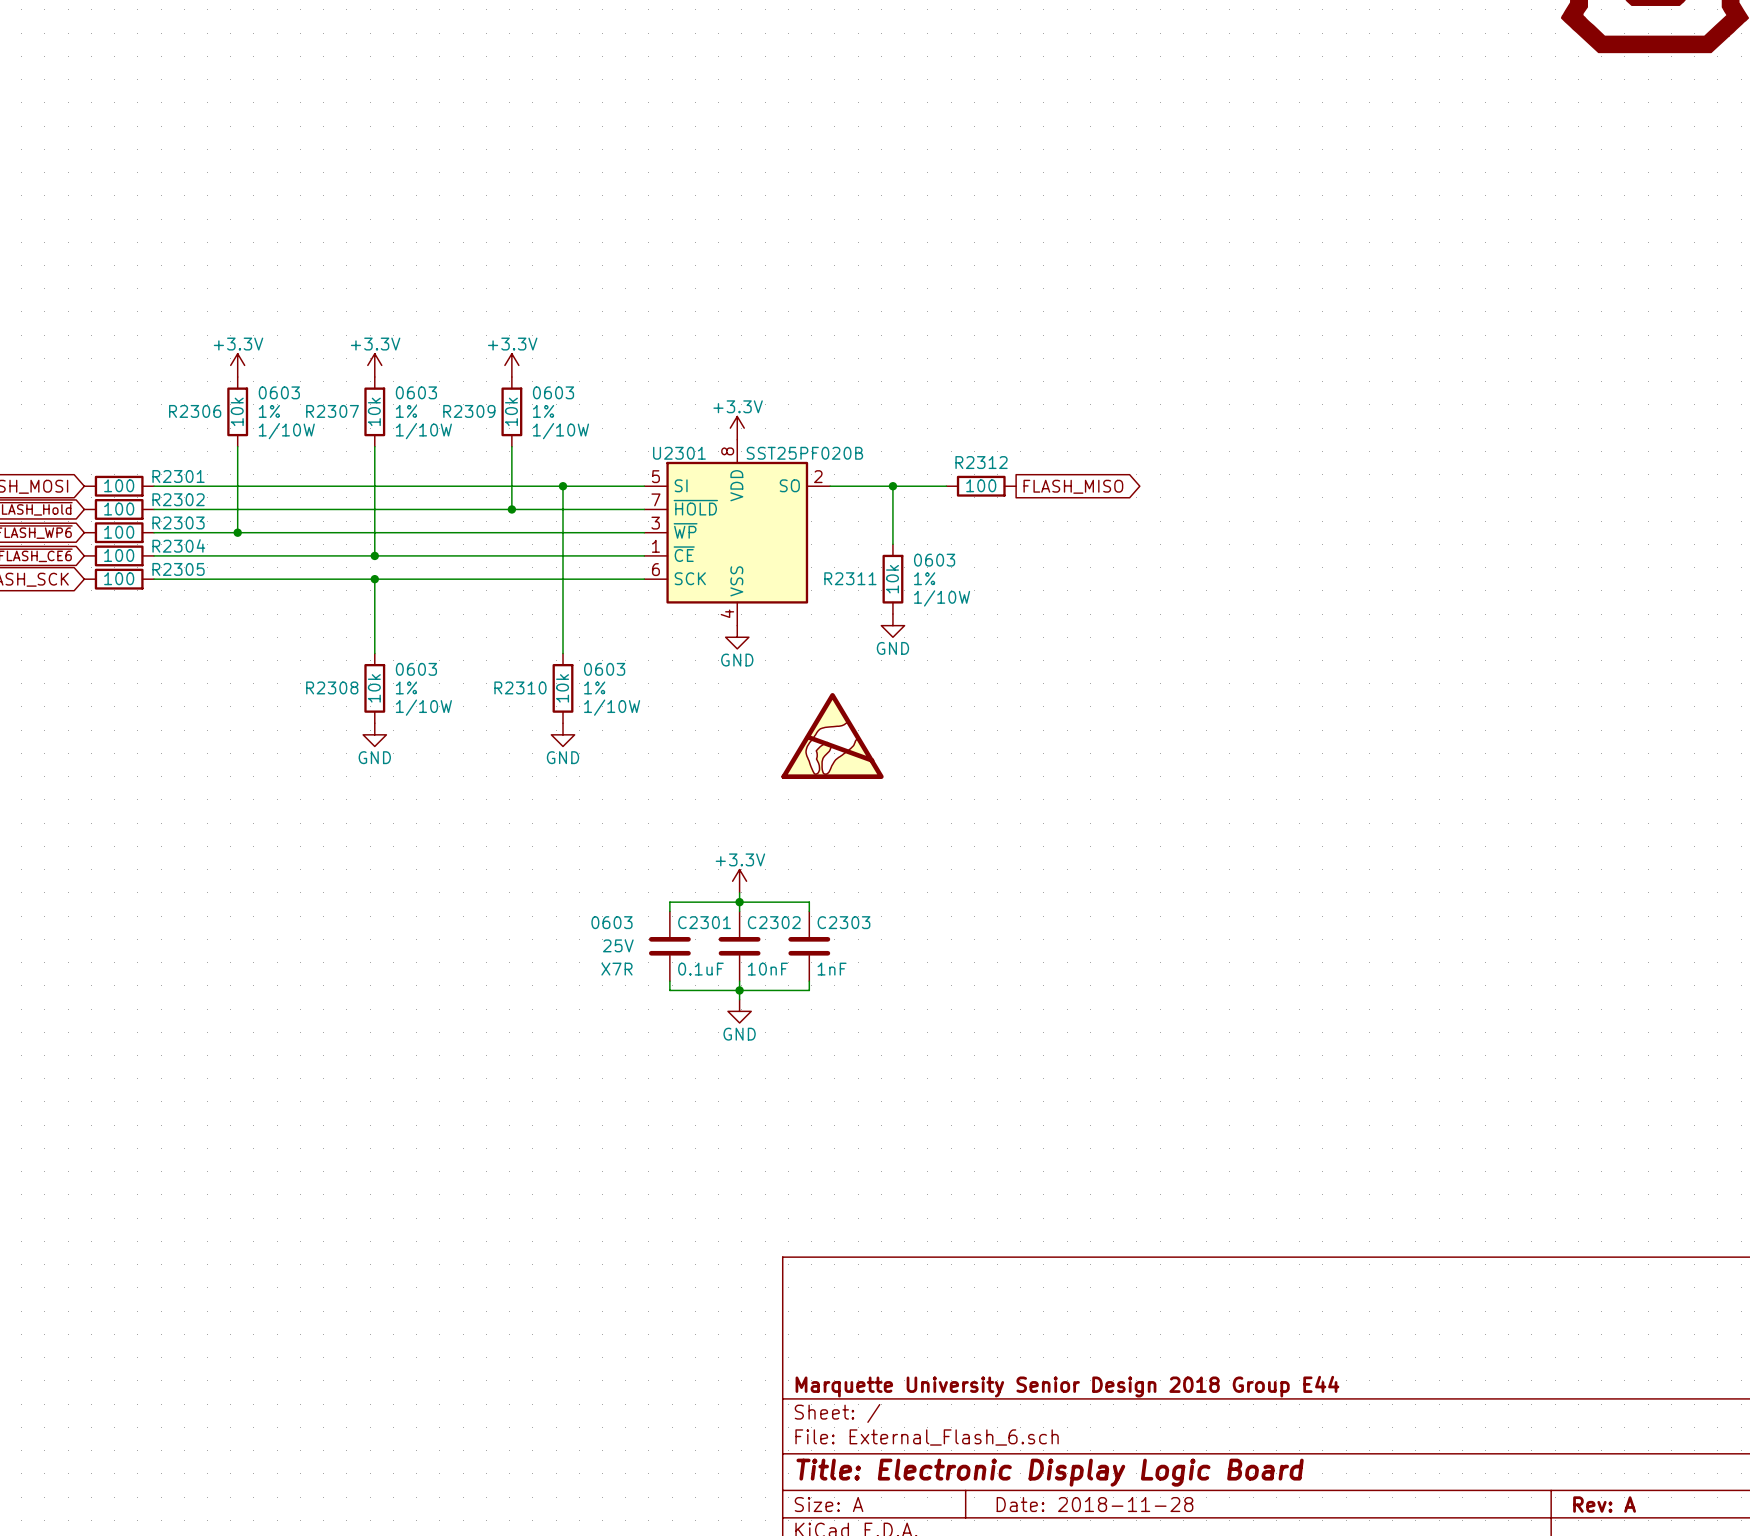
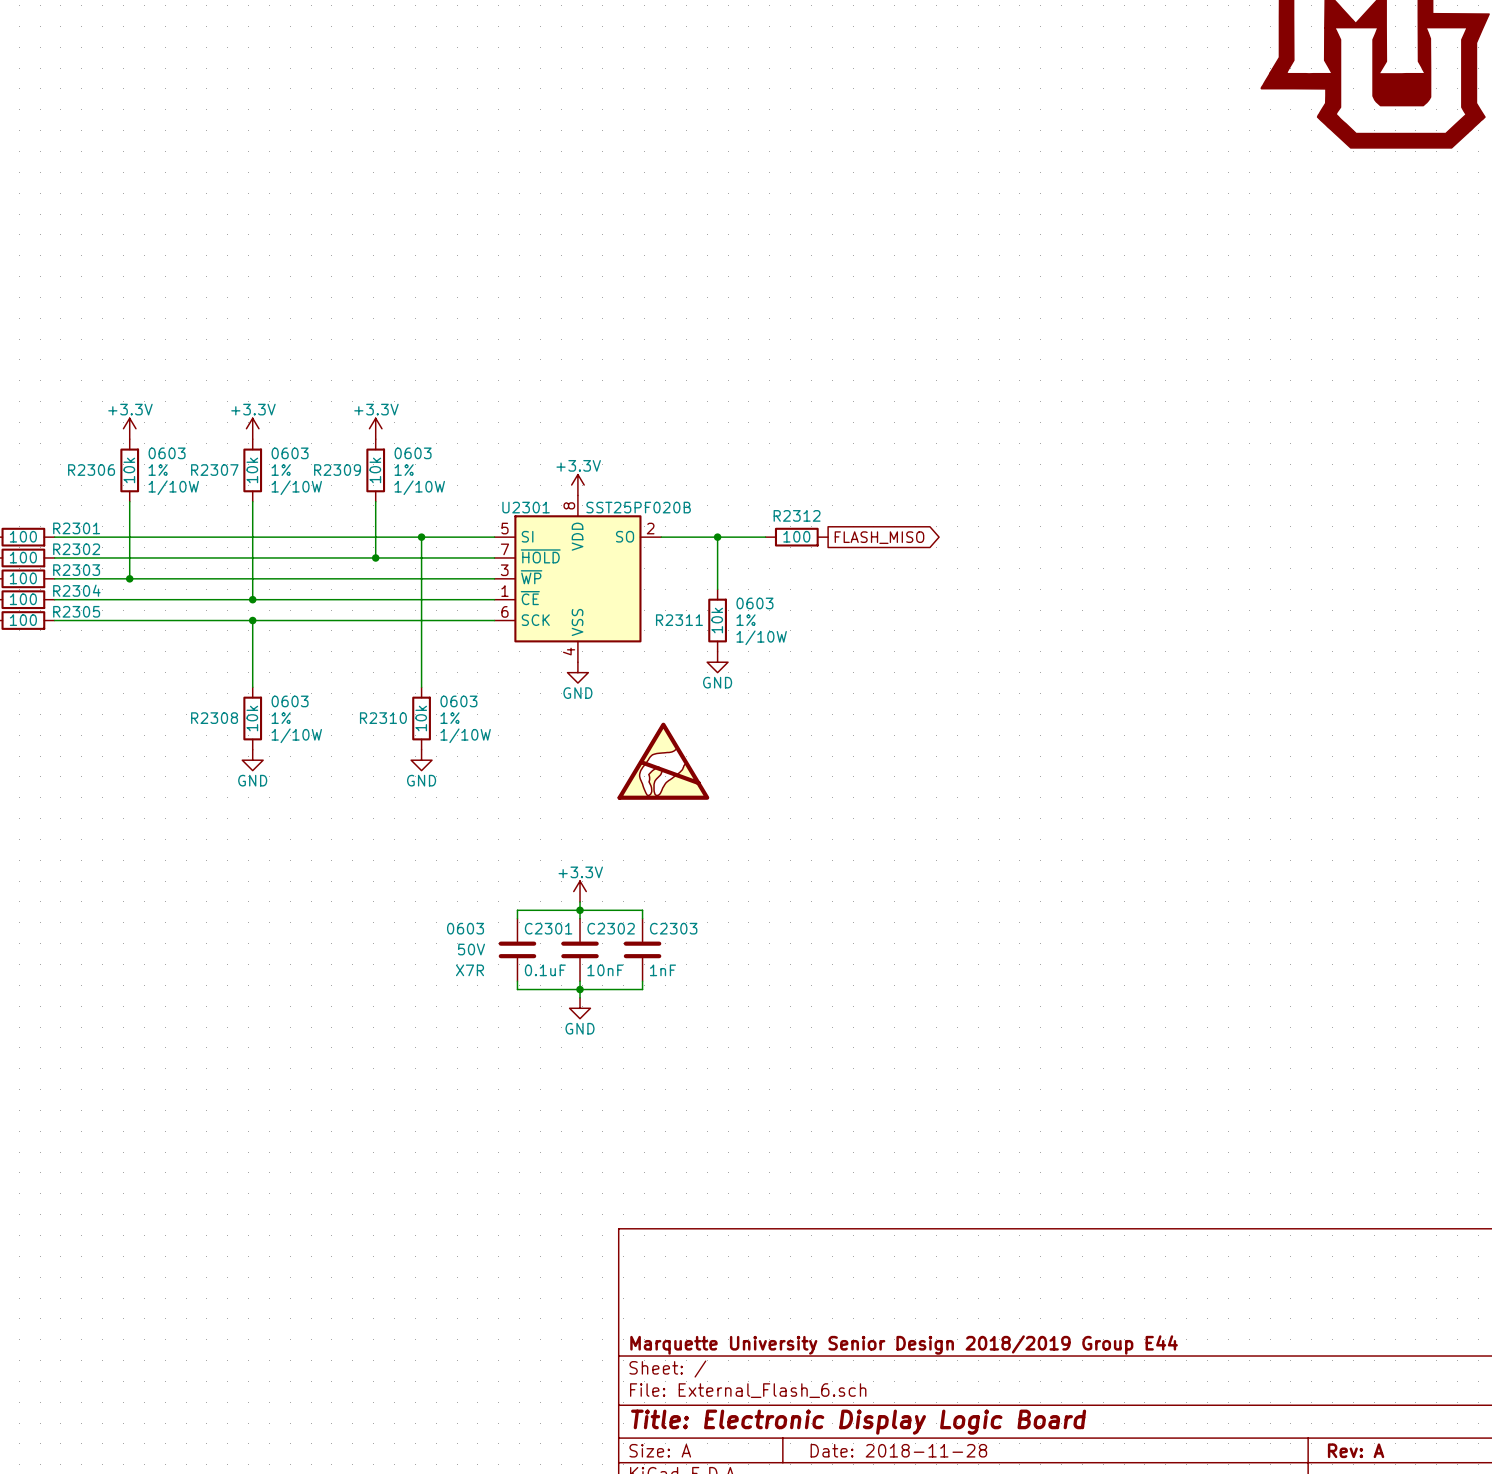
C2301 text: 25V (618, 945) -> 50V (471, 949)
title block: Marquette University Senior Design 2018 Group E44 (1067, 1386) -> Marquette University Senior Design 2018/2019 Group E44 (904, 1344)

